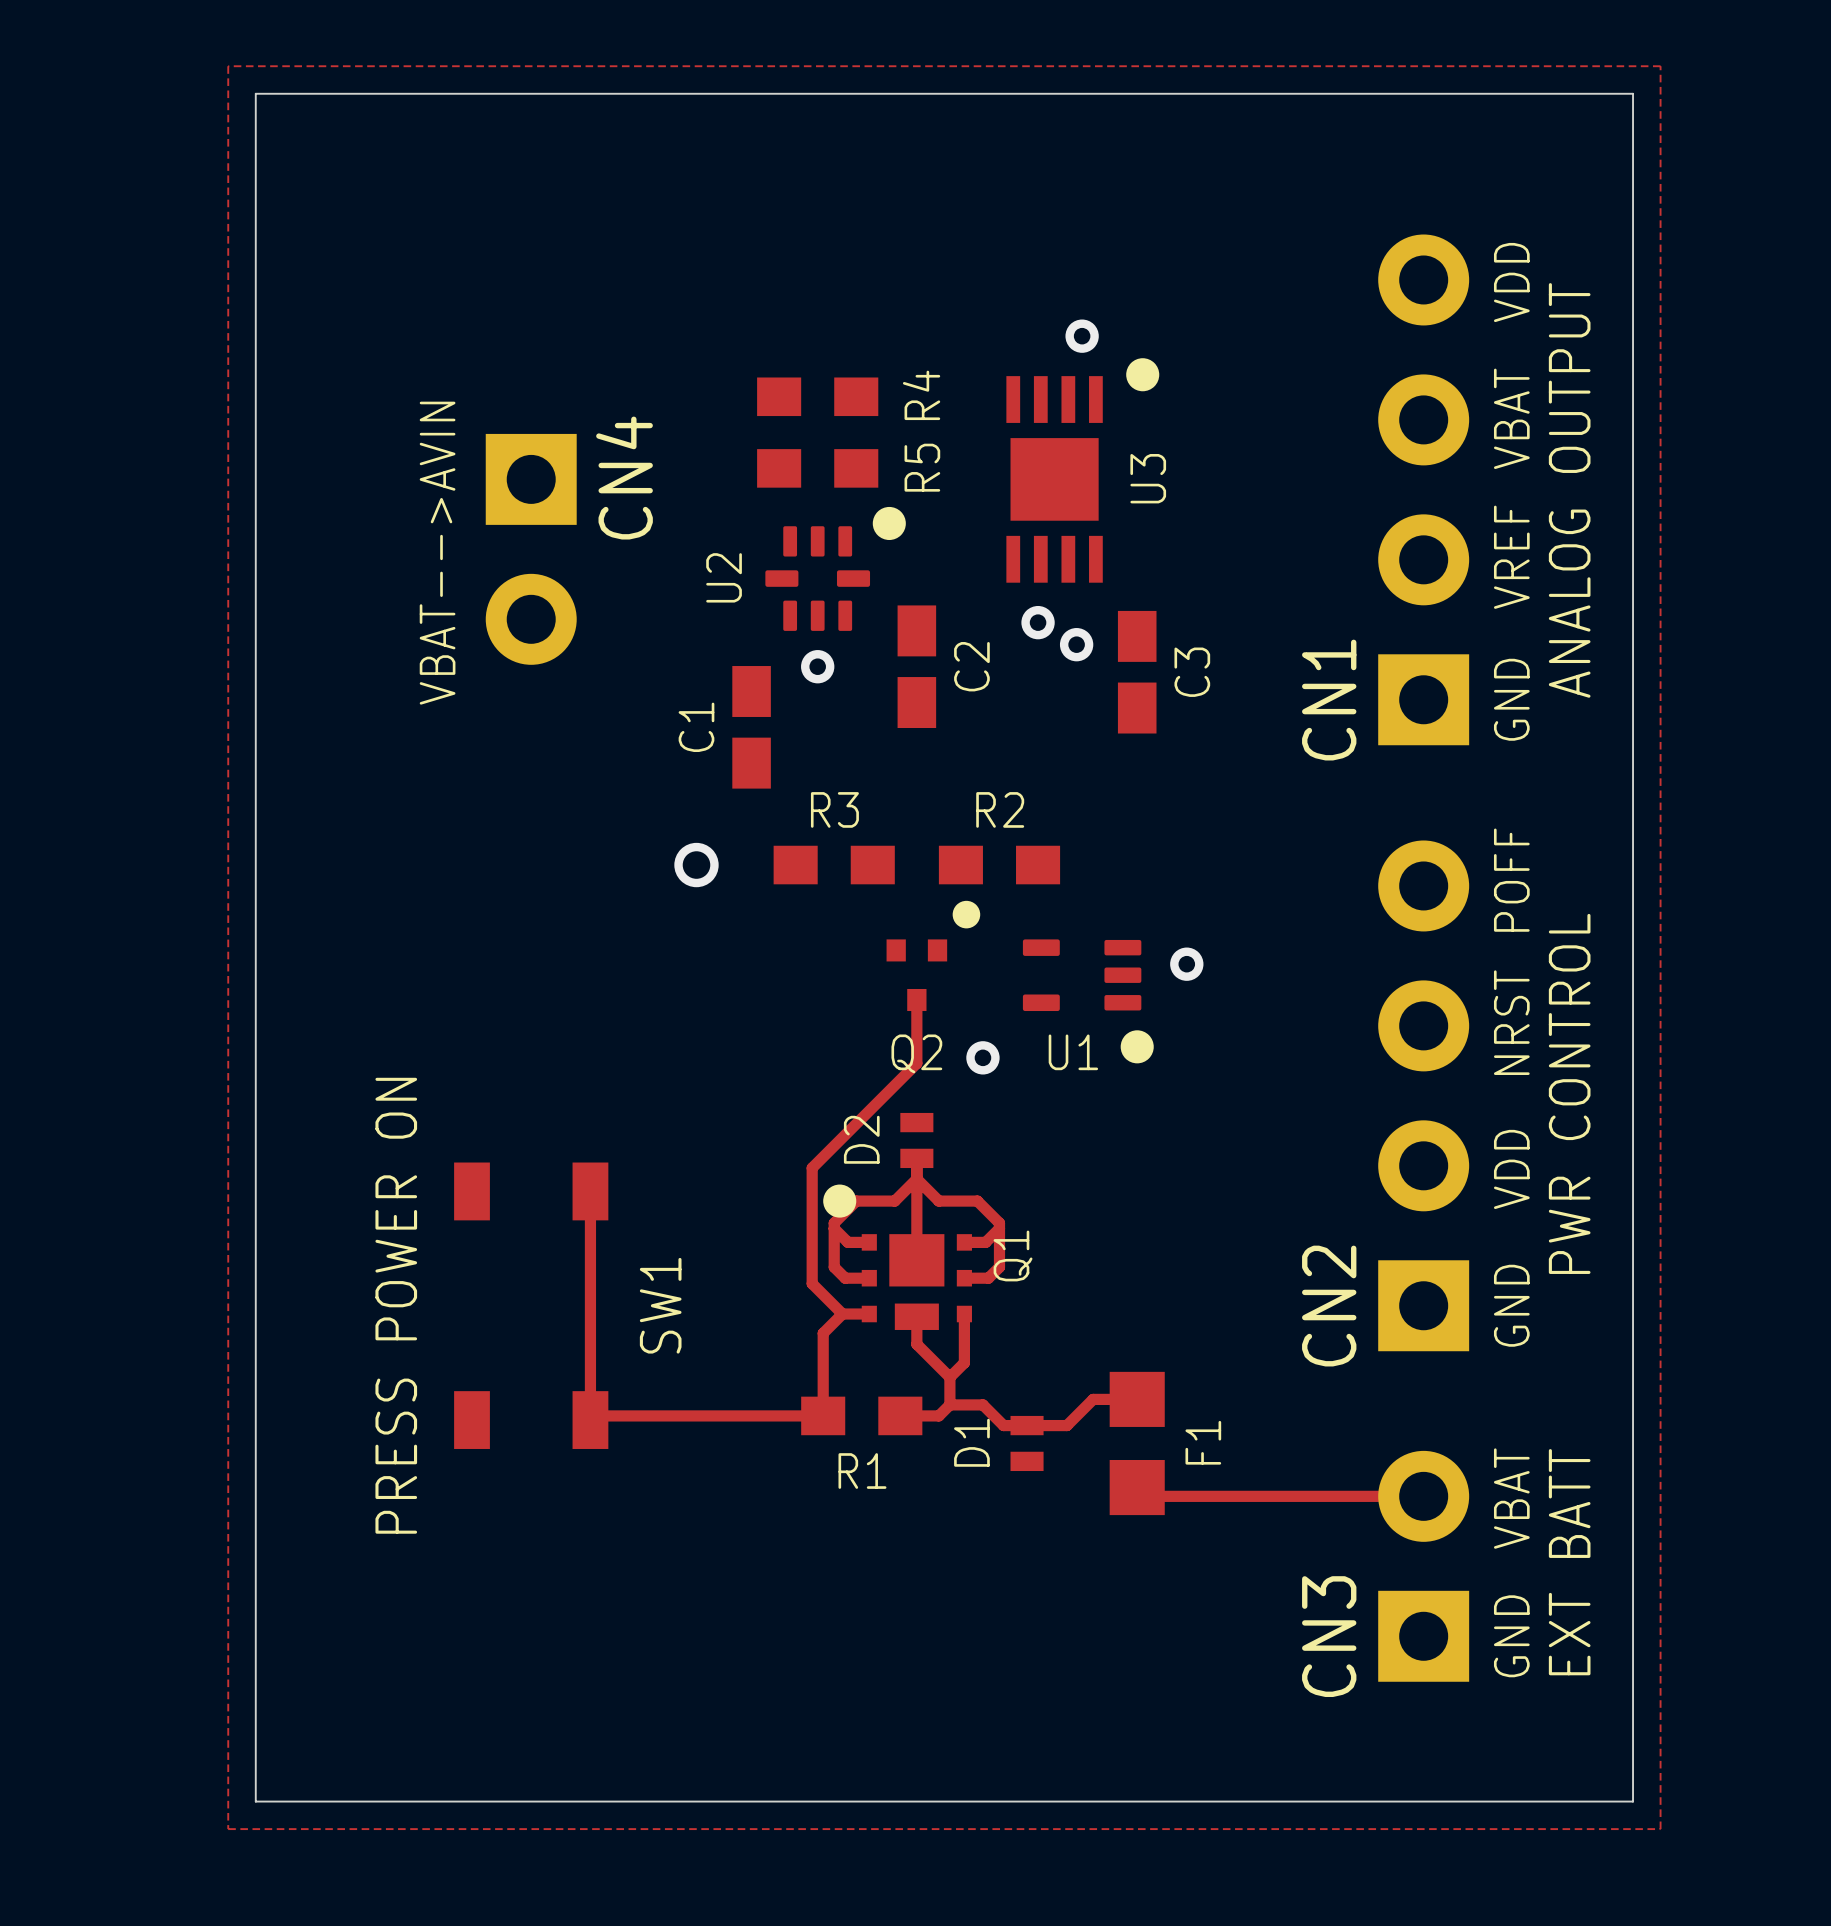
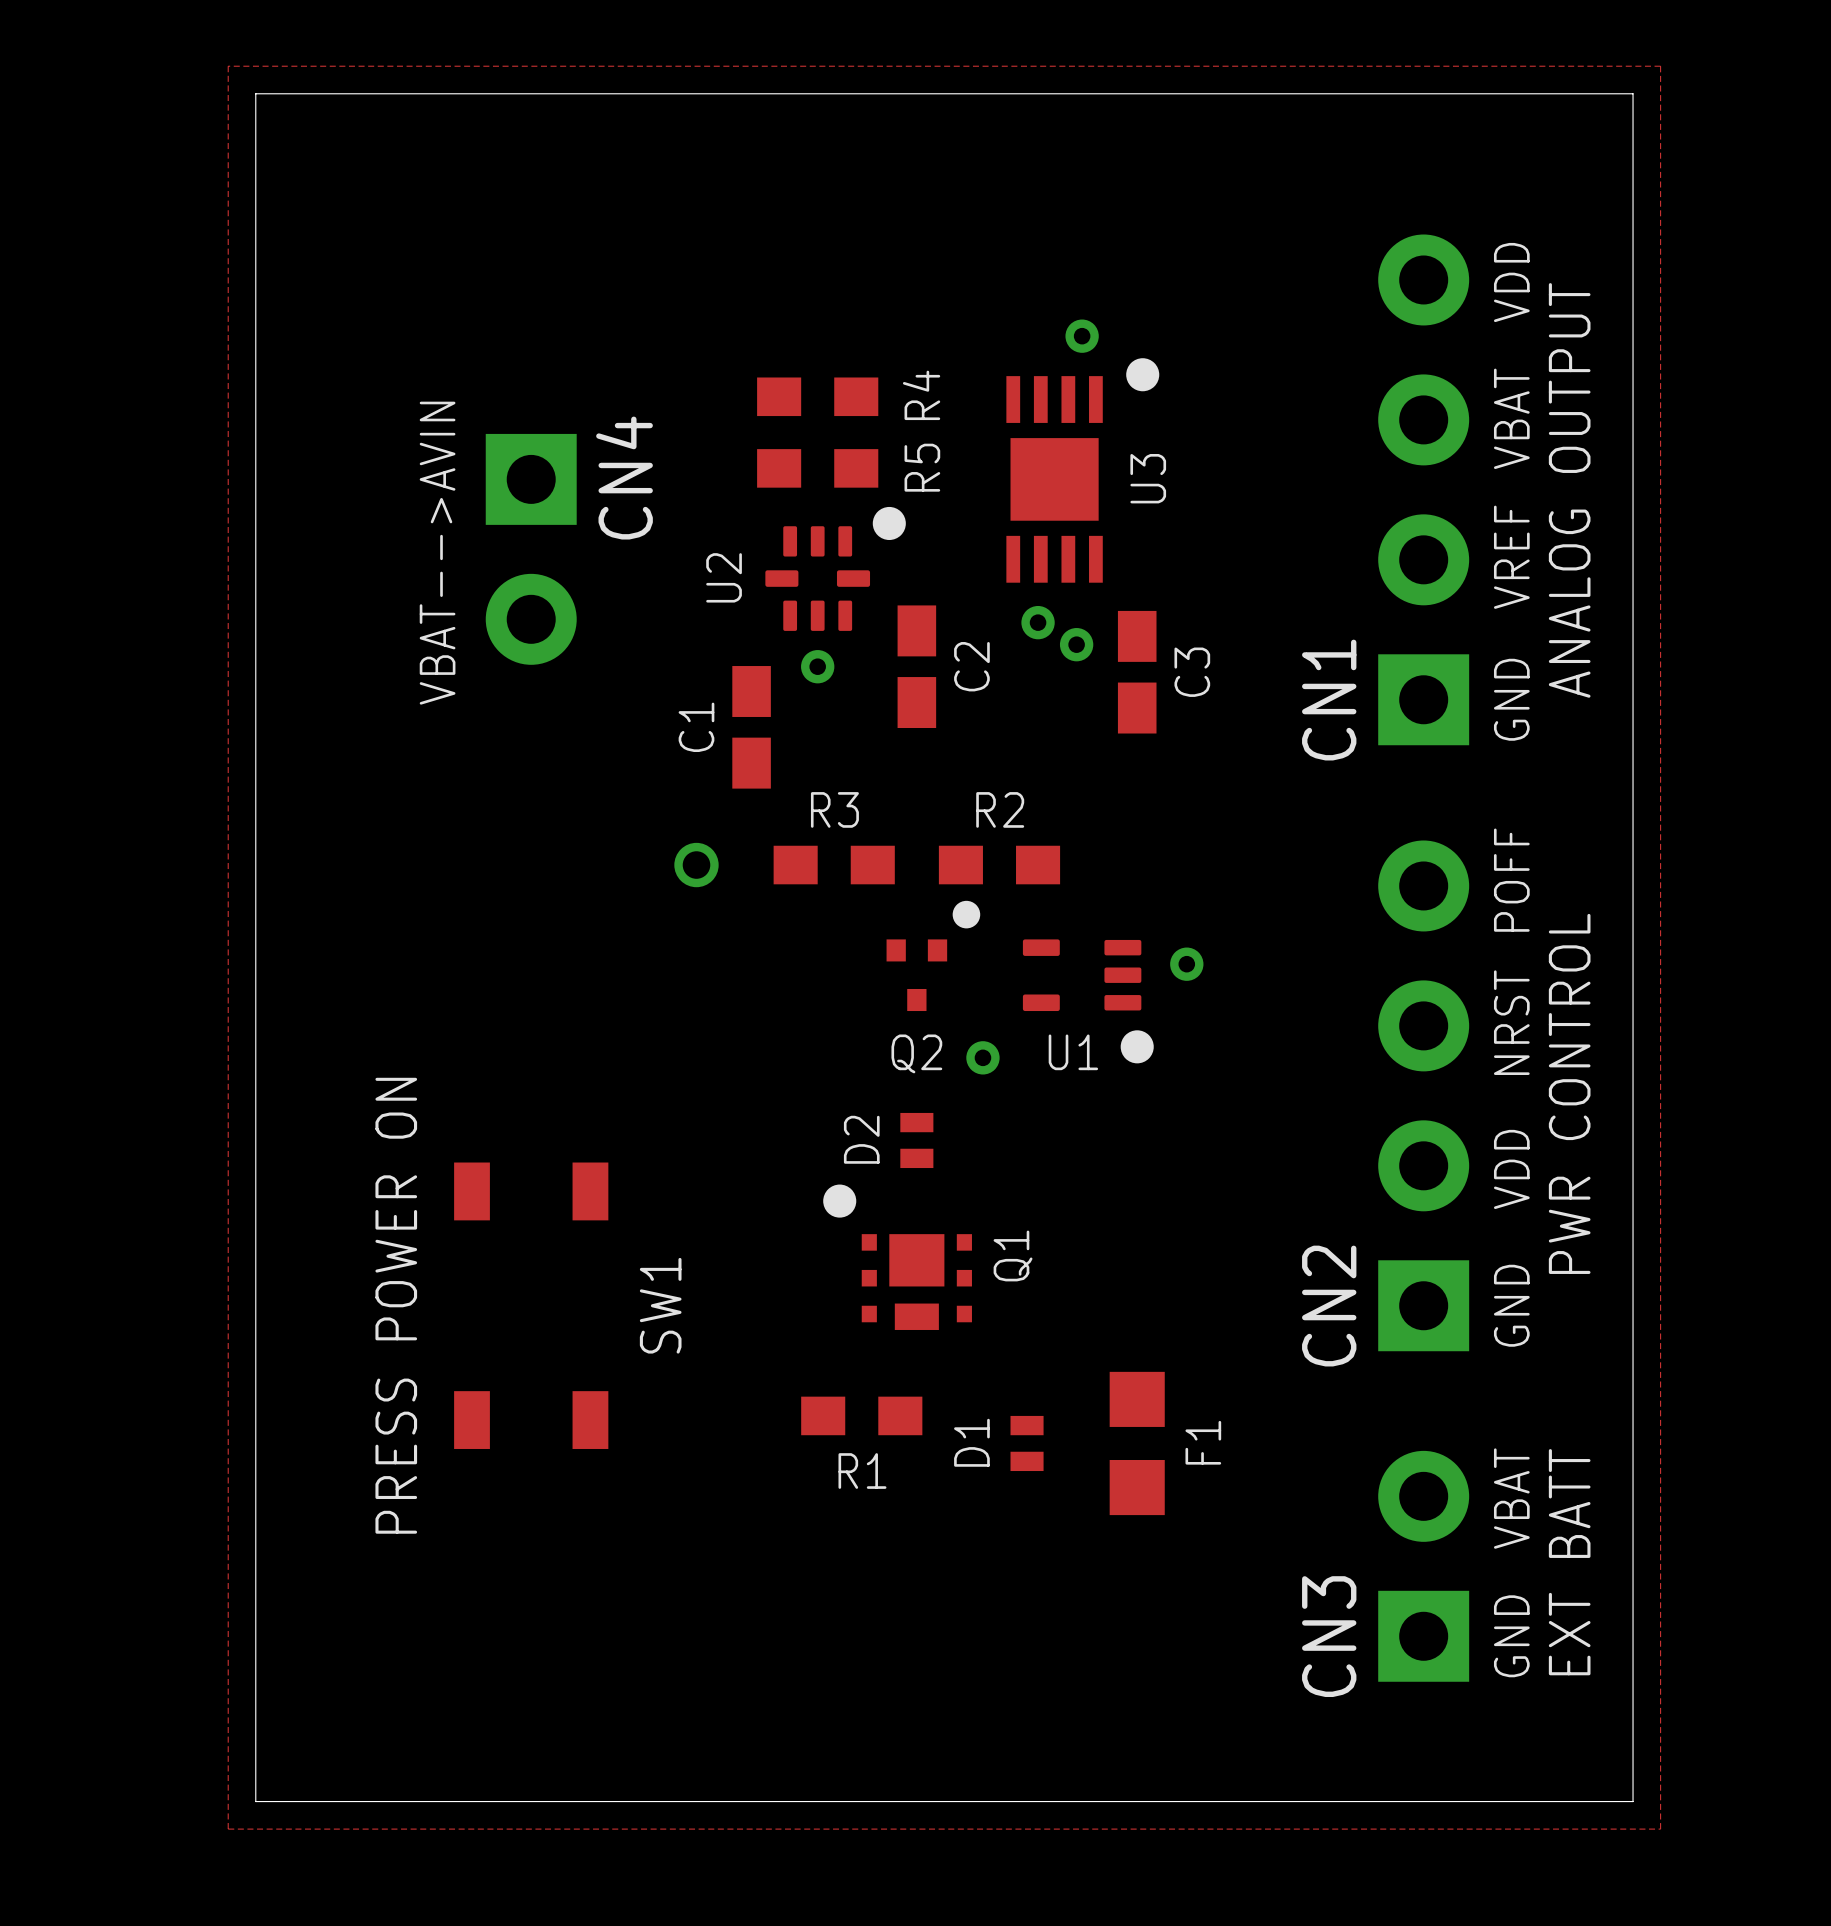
track: (916, 1000) (916, 1063) (812, 1168) (812, 1283) (842, 1314) -> none
track: (916, 1158) (916, 1260) -> none
track: (590, 1191) (590, 1420) (594, 1415) (823, 1415) (823, 1333) (842, 1314) -> none
track: (834, 1228) (847, 1242) (869, 1242) -> none
track: (999, 1228) (985, 1242) (964, 1242) -> none
track: (869, 1278) (845, 1278) (834, 1267) (834, 1223) (856, 1201) (894, 1201) (916, 1179) (938, 1201) (977, 1201) (999, 1223) (999, 1267) (988, 1278) (964, 1278) -> none
track: (842, 1314) (869, 1314) -> none
track: (964, 1314) (964, 1362) (949, 1377) -> none
track: (916, 1316) (916, 1344) (949, 1377) -> none
track: (949, 1377) (949, 1404) -> none
track: (1137, 1399) (1093, 1399) (1066, 1425) (1003, 1425) (982, 1404) (949, 1404) -> none
track: (949, 1404) (938, 1415) (900, 1415) -> none
track: (1137, 1487) (1146, 1496) (1423, 1496) -> none

